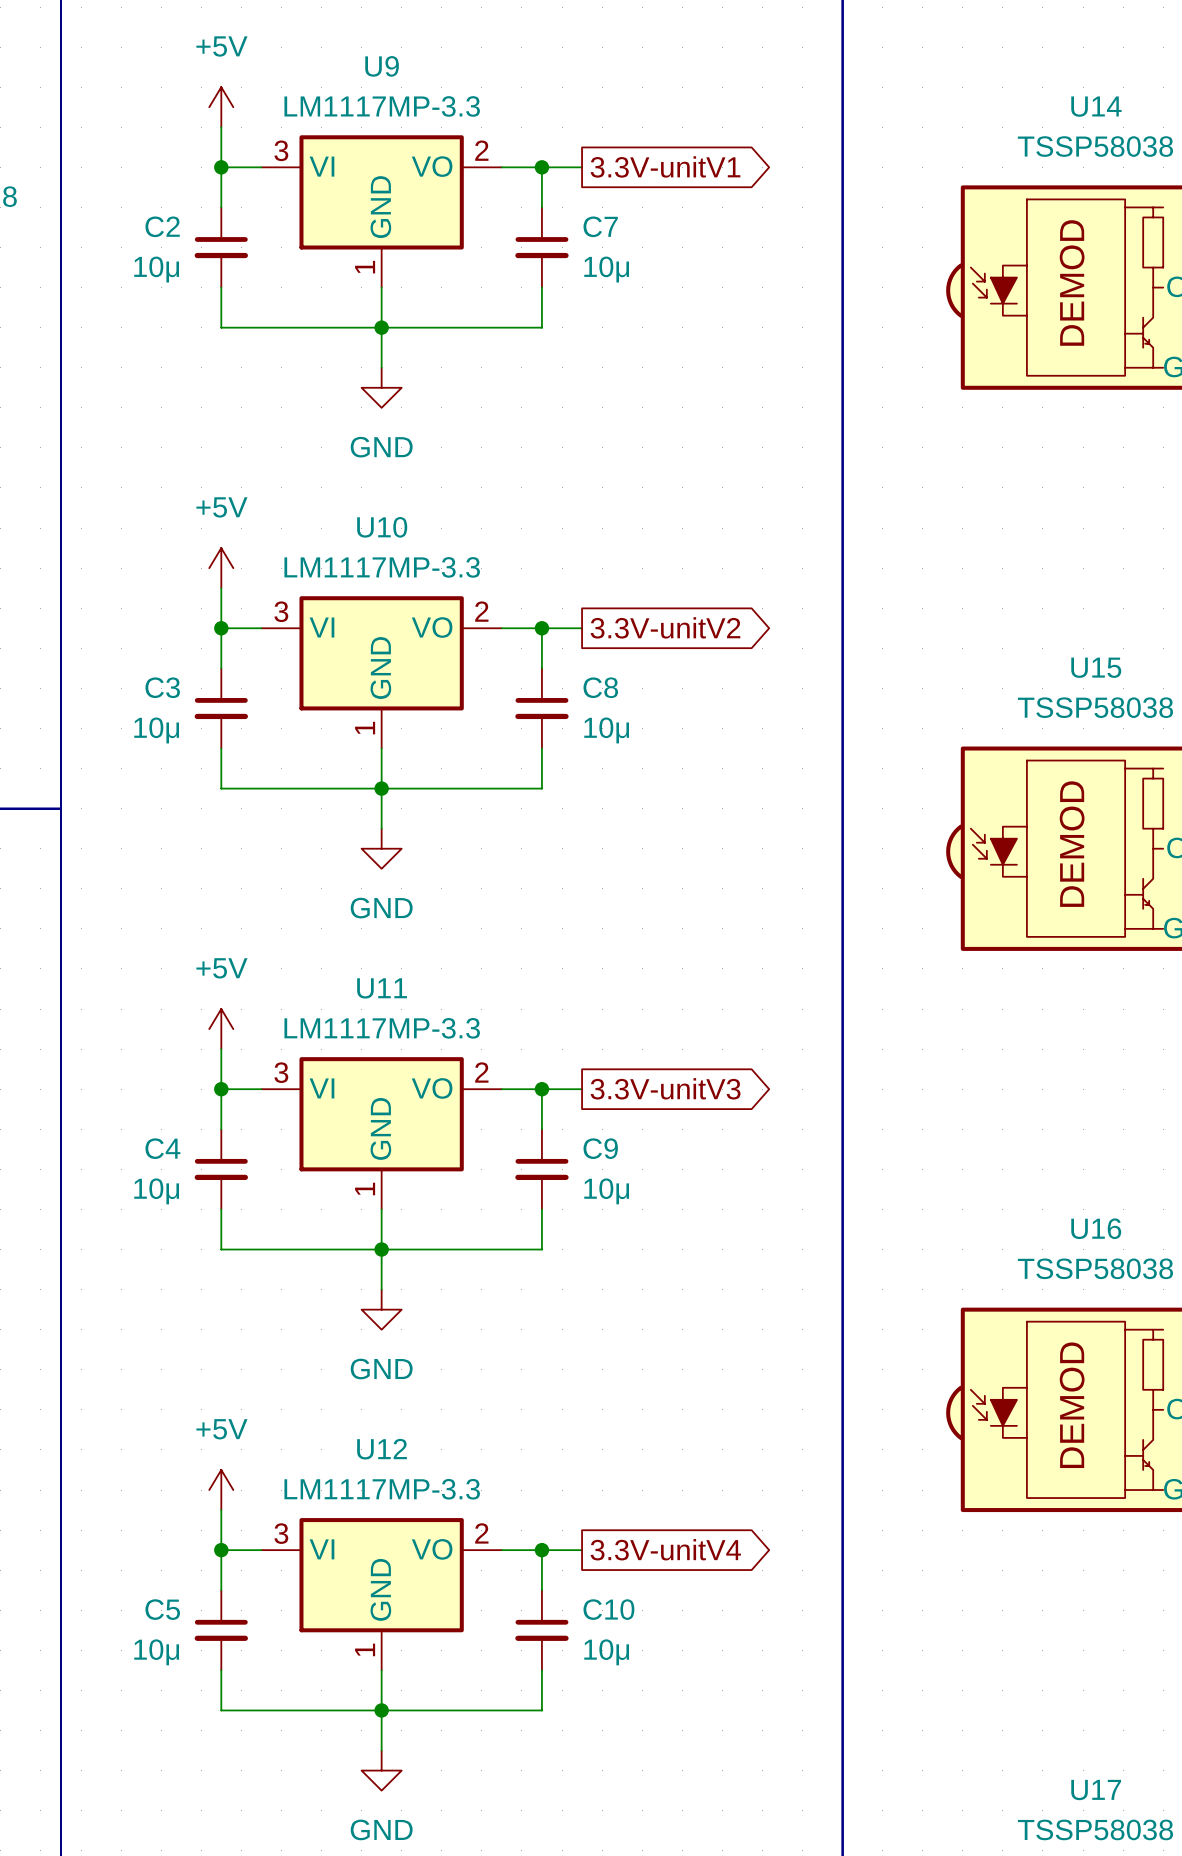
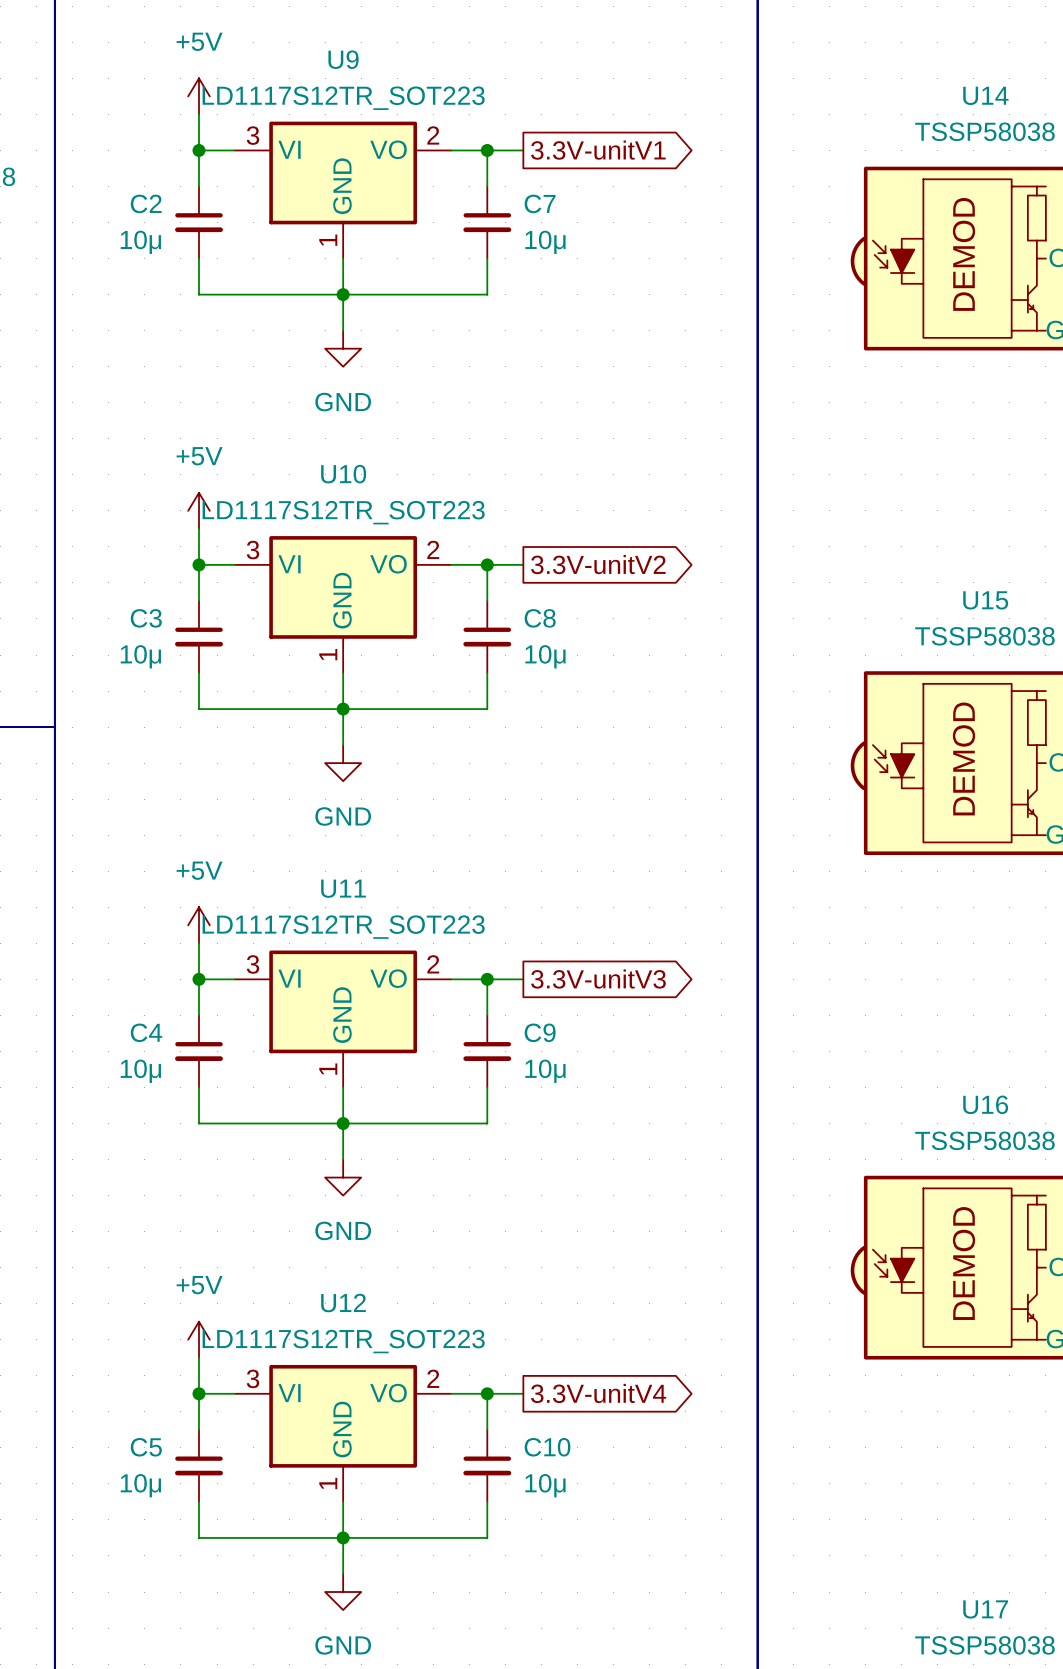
U9 value: LM1117MP-3.3 (382, 106) -> LD1117S12TR_SOT223 (343, 98)
U10 value: LM1117MP-3.3 (382, 567) -> LD1117S12TR_SOT223 (343, 512)
U11 value: LM1117MP-3.3 (382, 1028) -> LD1117S12TR_SOT223 (343, 927)
U12 value: LM1117MP-3.3 (382, 1489) -> LD1117S12TR_SOT223 (343, 1341)

